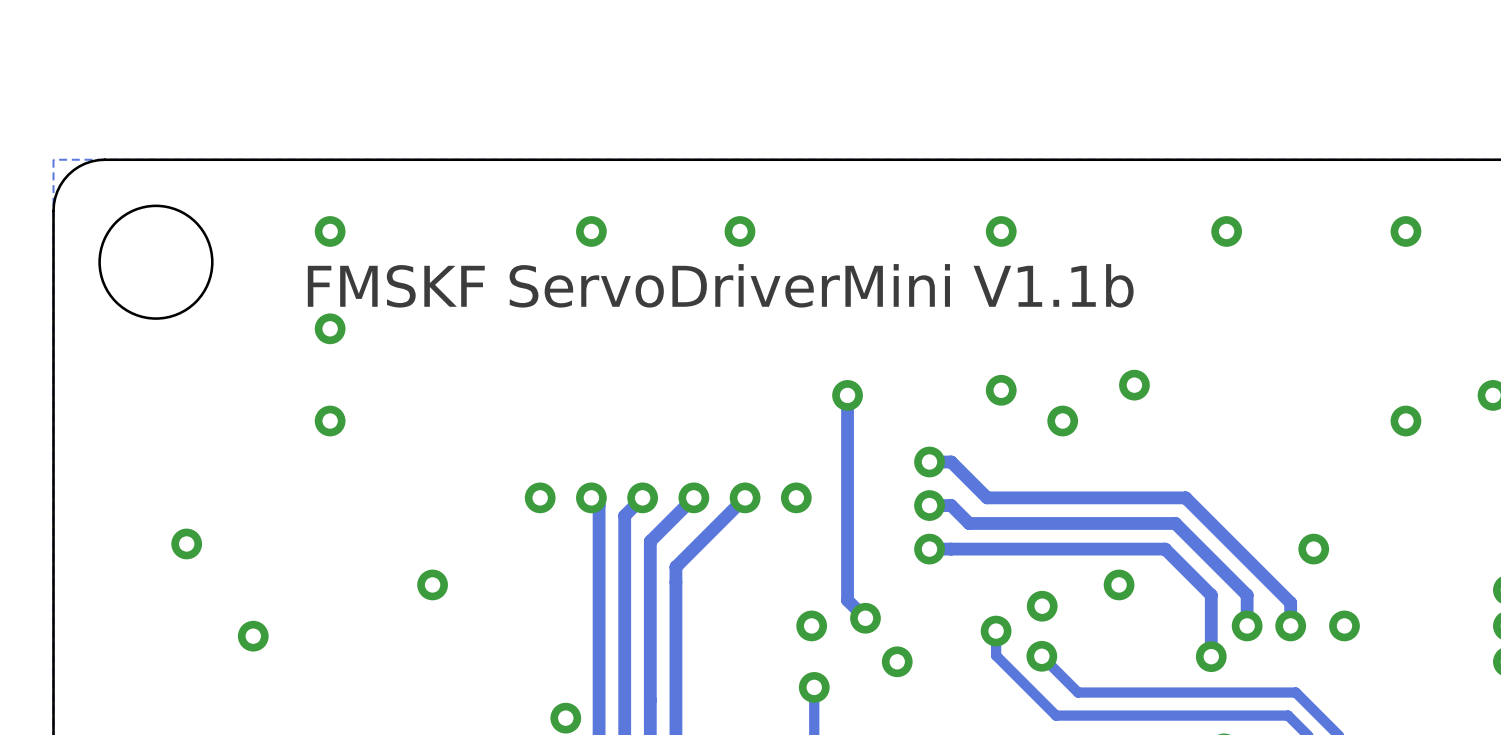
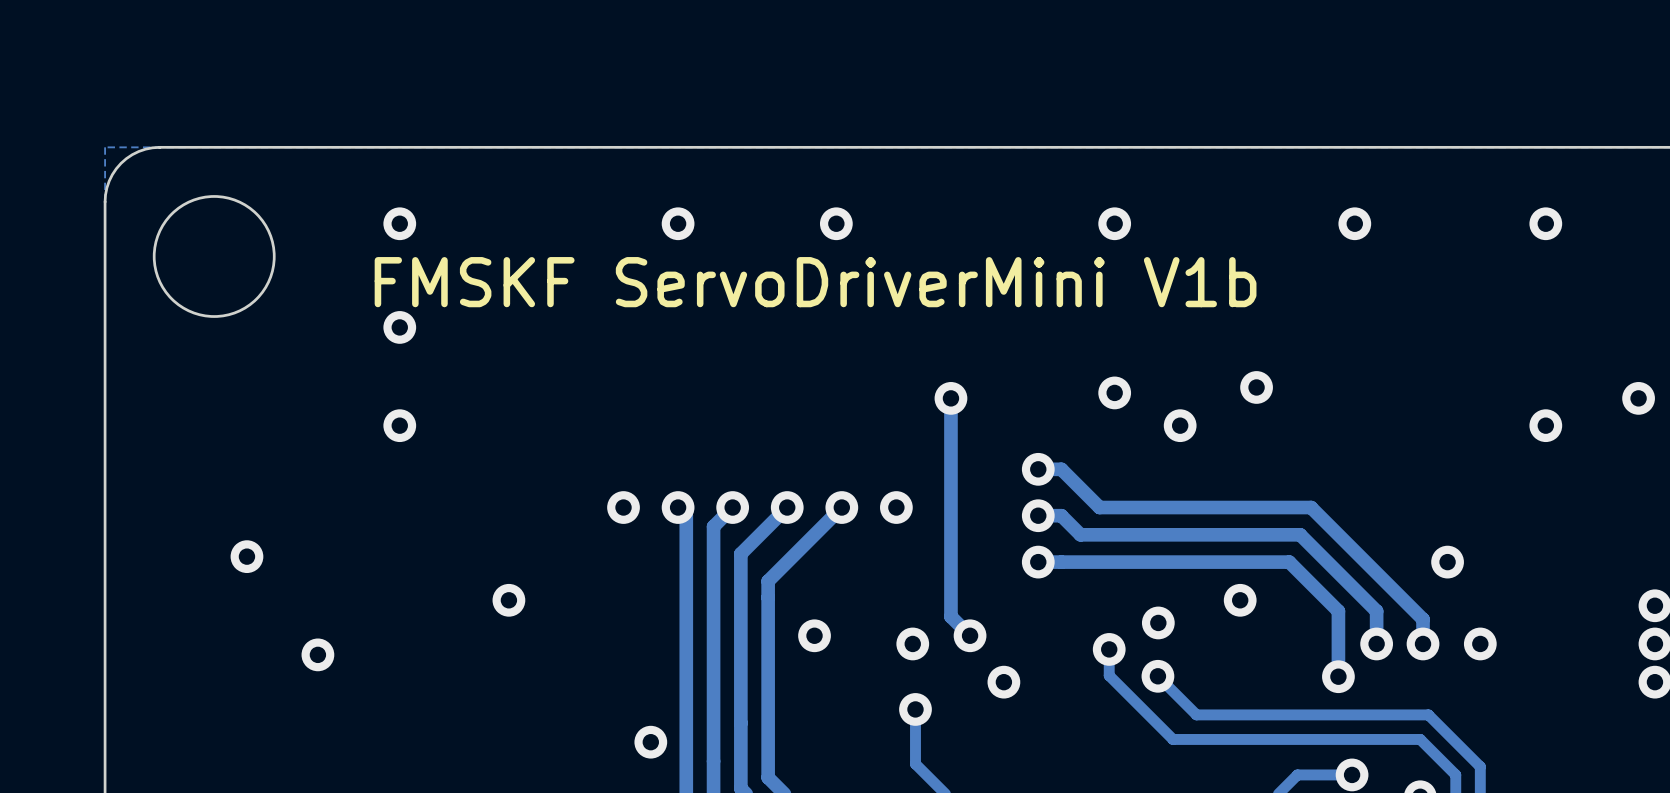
text: FMSKF ServoDriverMini V1.1b (720, 285) -> FMSKF ServoDriverMini V1b (815, 282)
via: none -> (814, 635)

